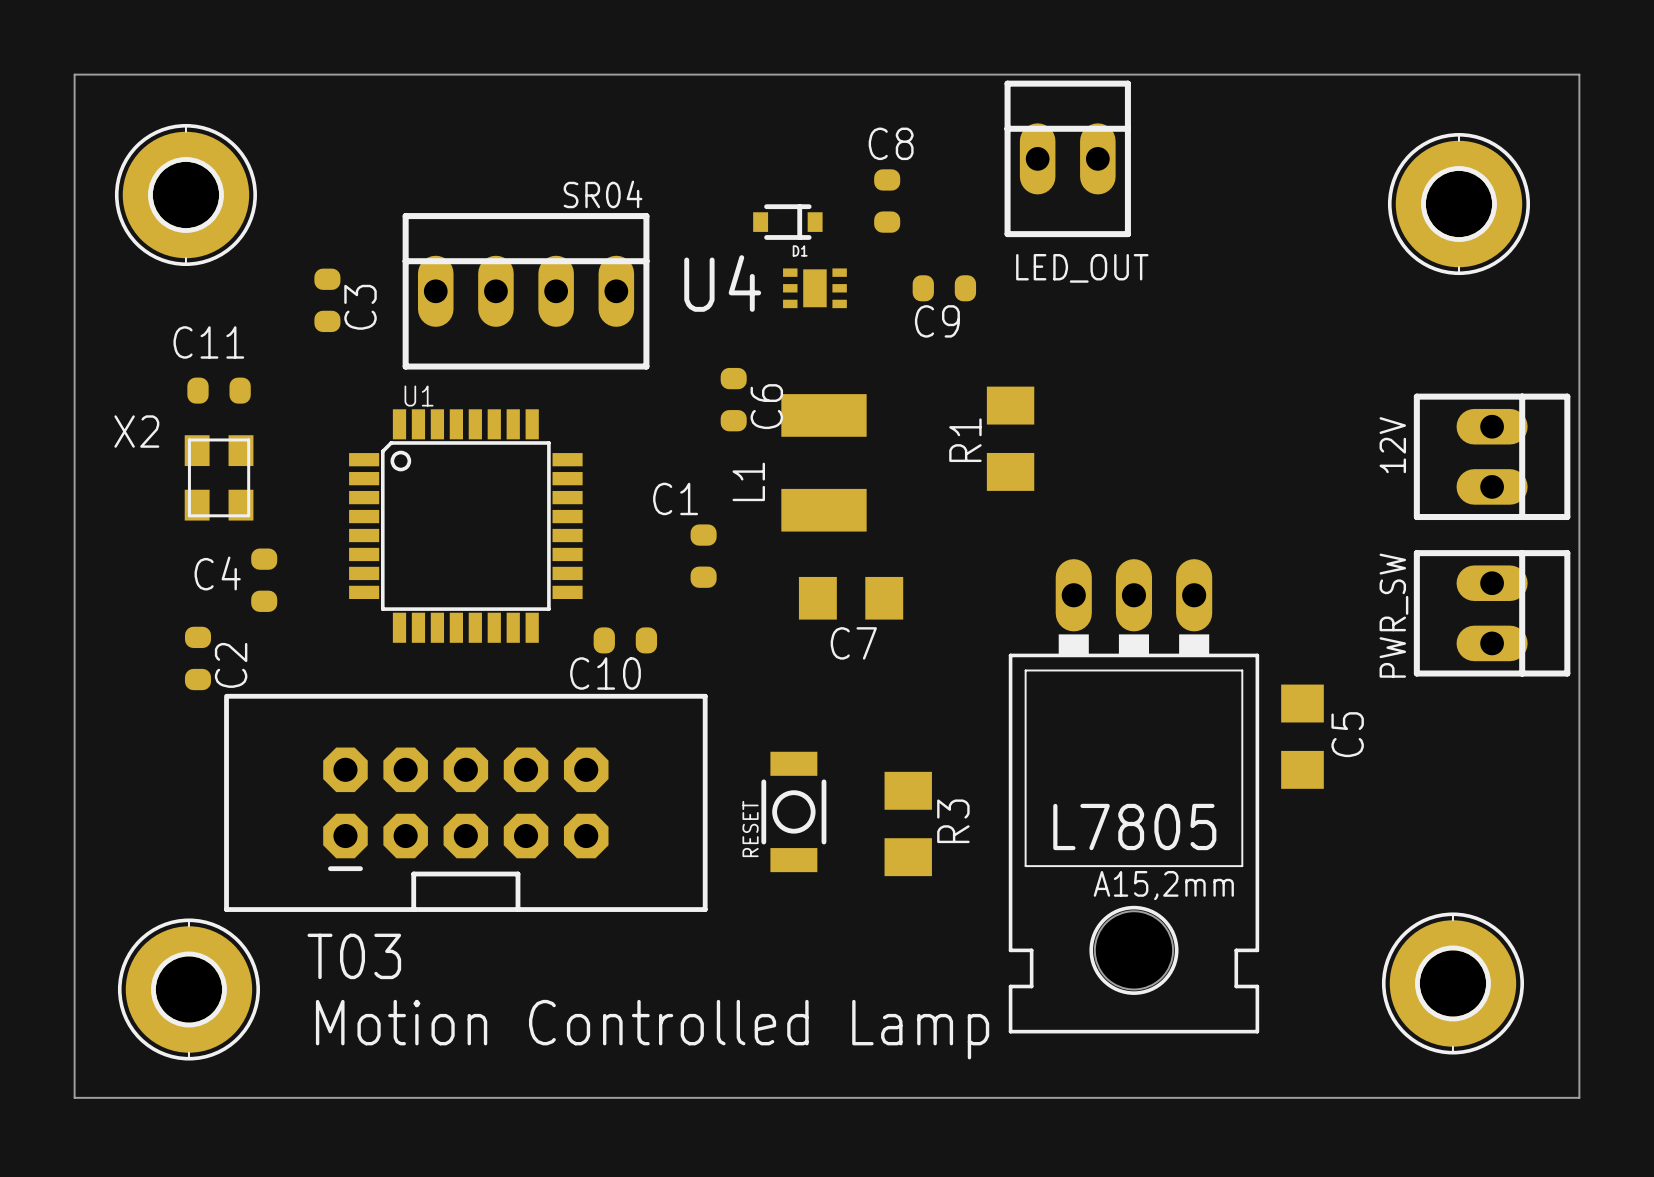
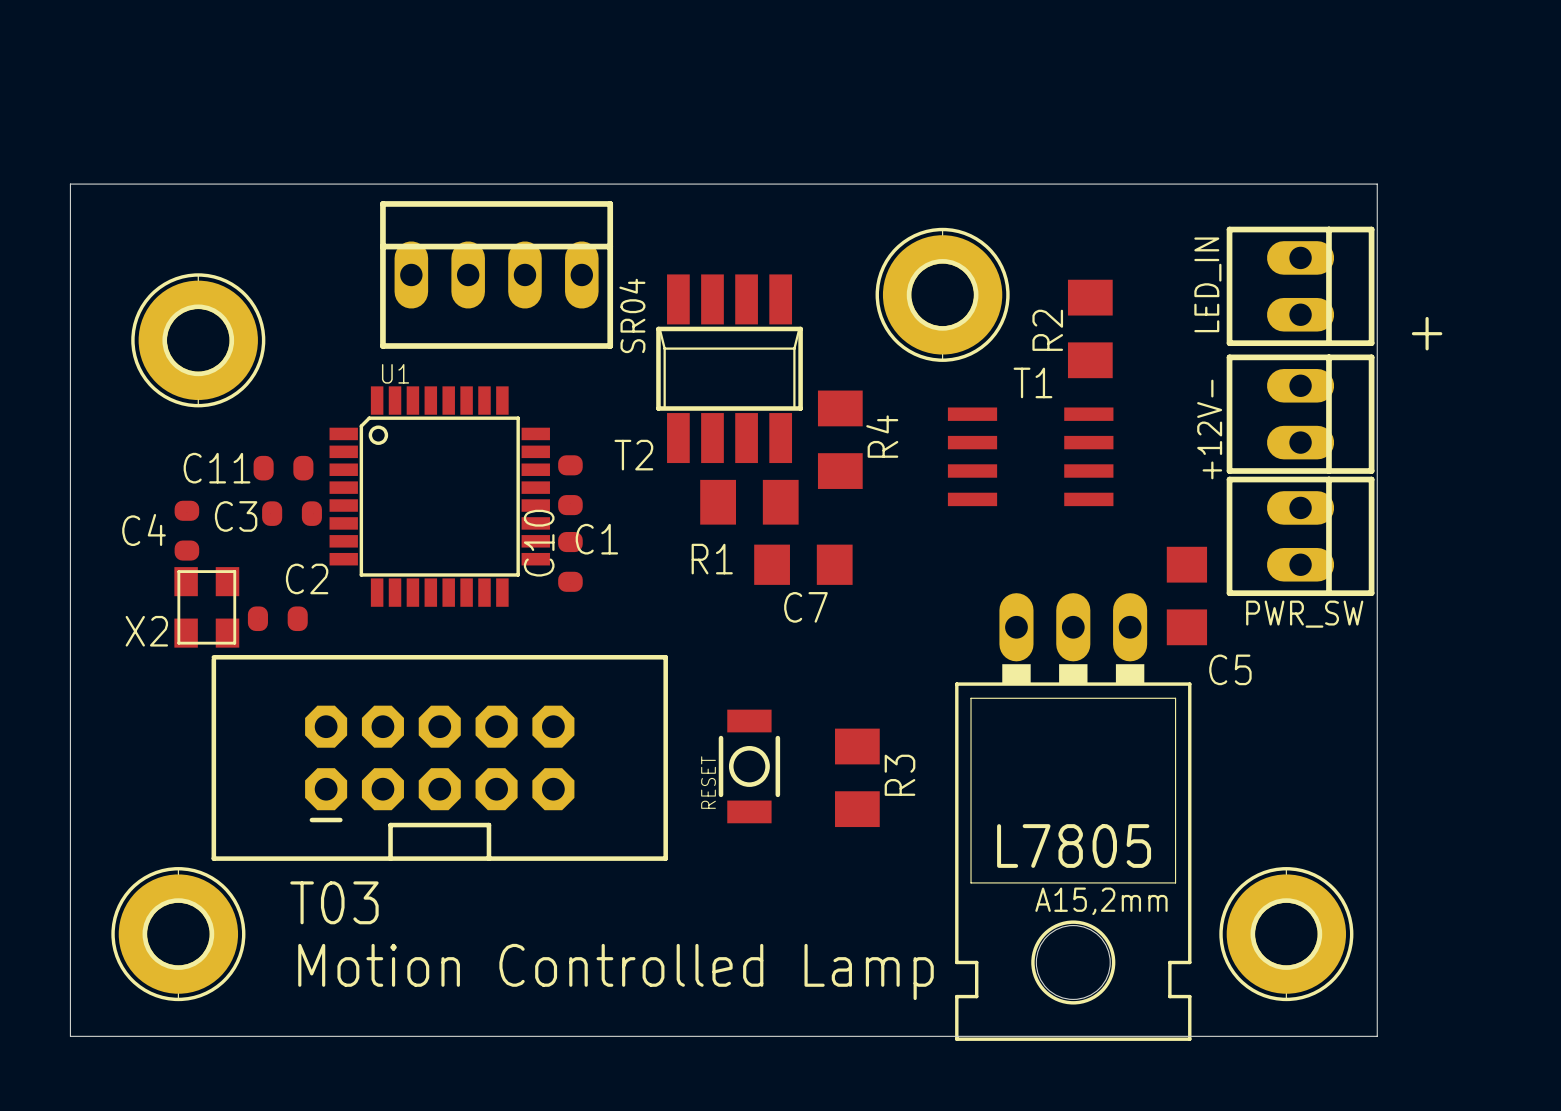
LED_OUT: (1067, 158) -> none
board edge: (74, 194) (74, 74) (1579, 74) (1579, 1097) (1458, 1097) -> (70, 184) (1377, 184) (1377, 1036)
part position: (185, 194) -> (198, 340)
SR04 name rotation: 0° (603, 194) -> 90° counterclockwise (632, 315)
SR04 name position: SR04 (603, 194) -> SR04 (632, 315)
C8: (887, 201) -> none
part: (1458, 204) -> none
D1: (787, 222) -> none
U4: (814, 288) -> none
C9: (944, 288) -> none
C3 rotation: 0° (327, 300) -> 90° clockwise (292, 513)
C3 position: (327, 300) -> (292, 513)
LED_IN: none -> (1300, 286)
C3 name position: C3 (360, 307) -> C3 (236, 516)
part: none -> (942, 294)
C11 name position: C11 (208, 342) -> C11 (217, 468)
R2: none -> (1090, 328)
text: none -> + (1427, 333)
C11 position: (219, 390) -> (283, 468)
T2: none -> (729, 368)
C6: (733, 399) -> none
X2 name position: X2 (136, 431) -> X2 (146, 631)
R1 rotation: 0° (1010, 438) -> 90° clockwise (749, 502)
R1 position: (1010, 438) -> (749, 502)
+12V-: none -> (1300, 414)
R1 name position: R1 (965, 440) -> R1 (712, 559)
12V: (1492, 456) -> none
L1: (823, 462) -> none
R4: none -> (840, 439)
X2 position: (219, 477) -> (206, 607)
T1: none -> (1030, 456)
C1 name position: C1 (675, 498) -> C1 (596, 539)
C1 position: (703, 556) -> (570, 485)
C4 name position: C4 (217, 573) -> C4 (144, 529)
C4 position: (264, 580) -> (186, 530)
PWR_SW position: (1492, 613) -> (1300, 536)
PWR_SW name rotation: 0° (1393, 615) -> 90° clockwise (1304, 614)
C10 rotation: 0° (625, 640) -> 90° clockwise (570, 561)
C10 position: (625, 640) -> (570, 561)
C2 rotation: 0° (198, 658) -> 90° clockwise (277, 618)
C2 position: (198, 658) -> (277, 618)
C2 name position: C2 (231, 665) -> C2 (307, 578)
C5 name rotation: 0° (1347, 734) -> 90° clockwise (1230, 669)
C5 position: (1302, 736) -> (1186, 596)
L7805 position: (1133, 796) -> (1073, 817)
part position: (1452, 983) -> (1286, 934)

